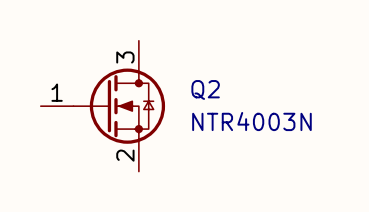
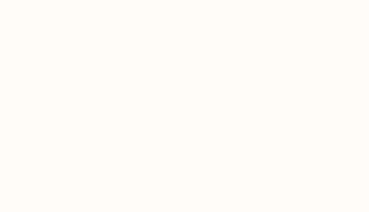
Q2: NTR4003N (102, 106) -> none

